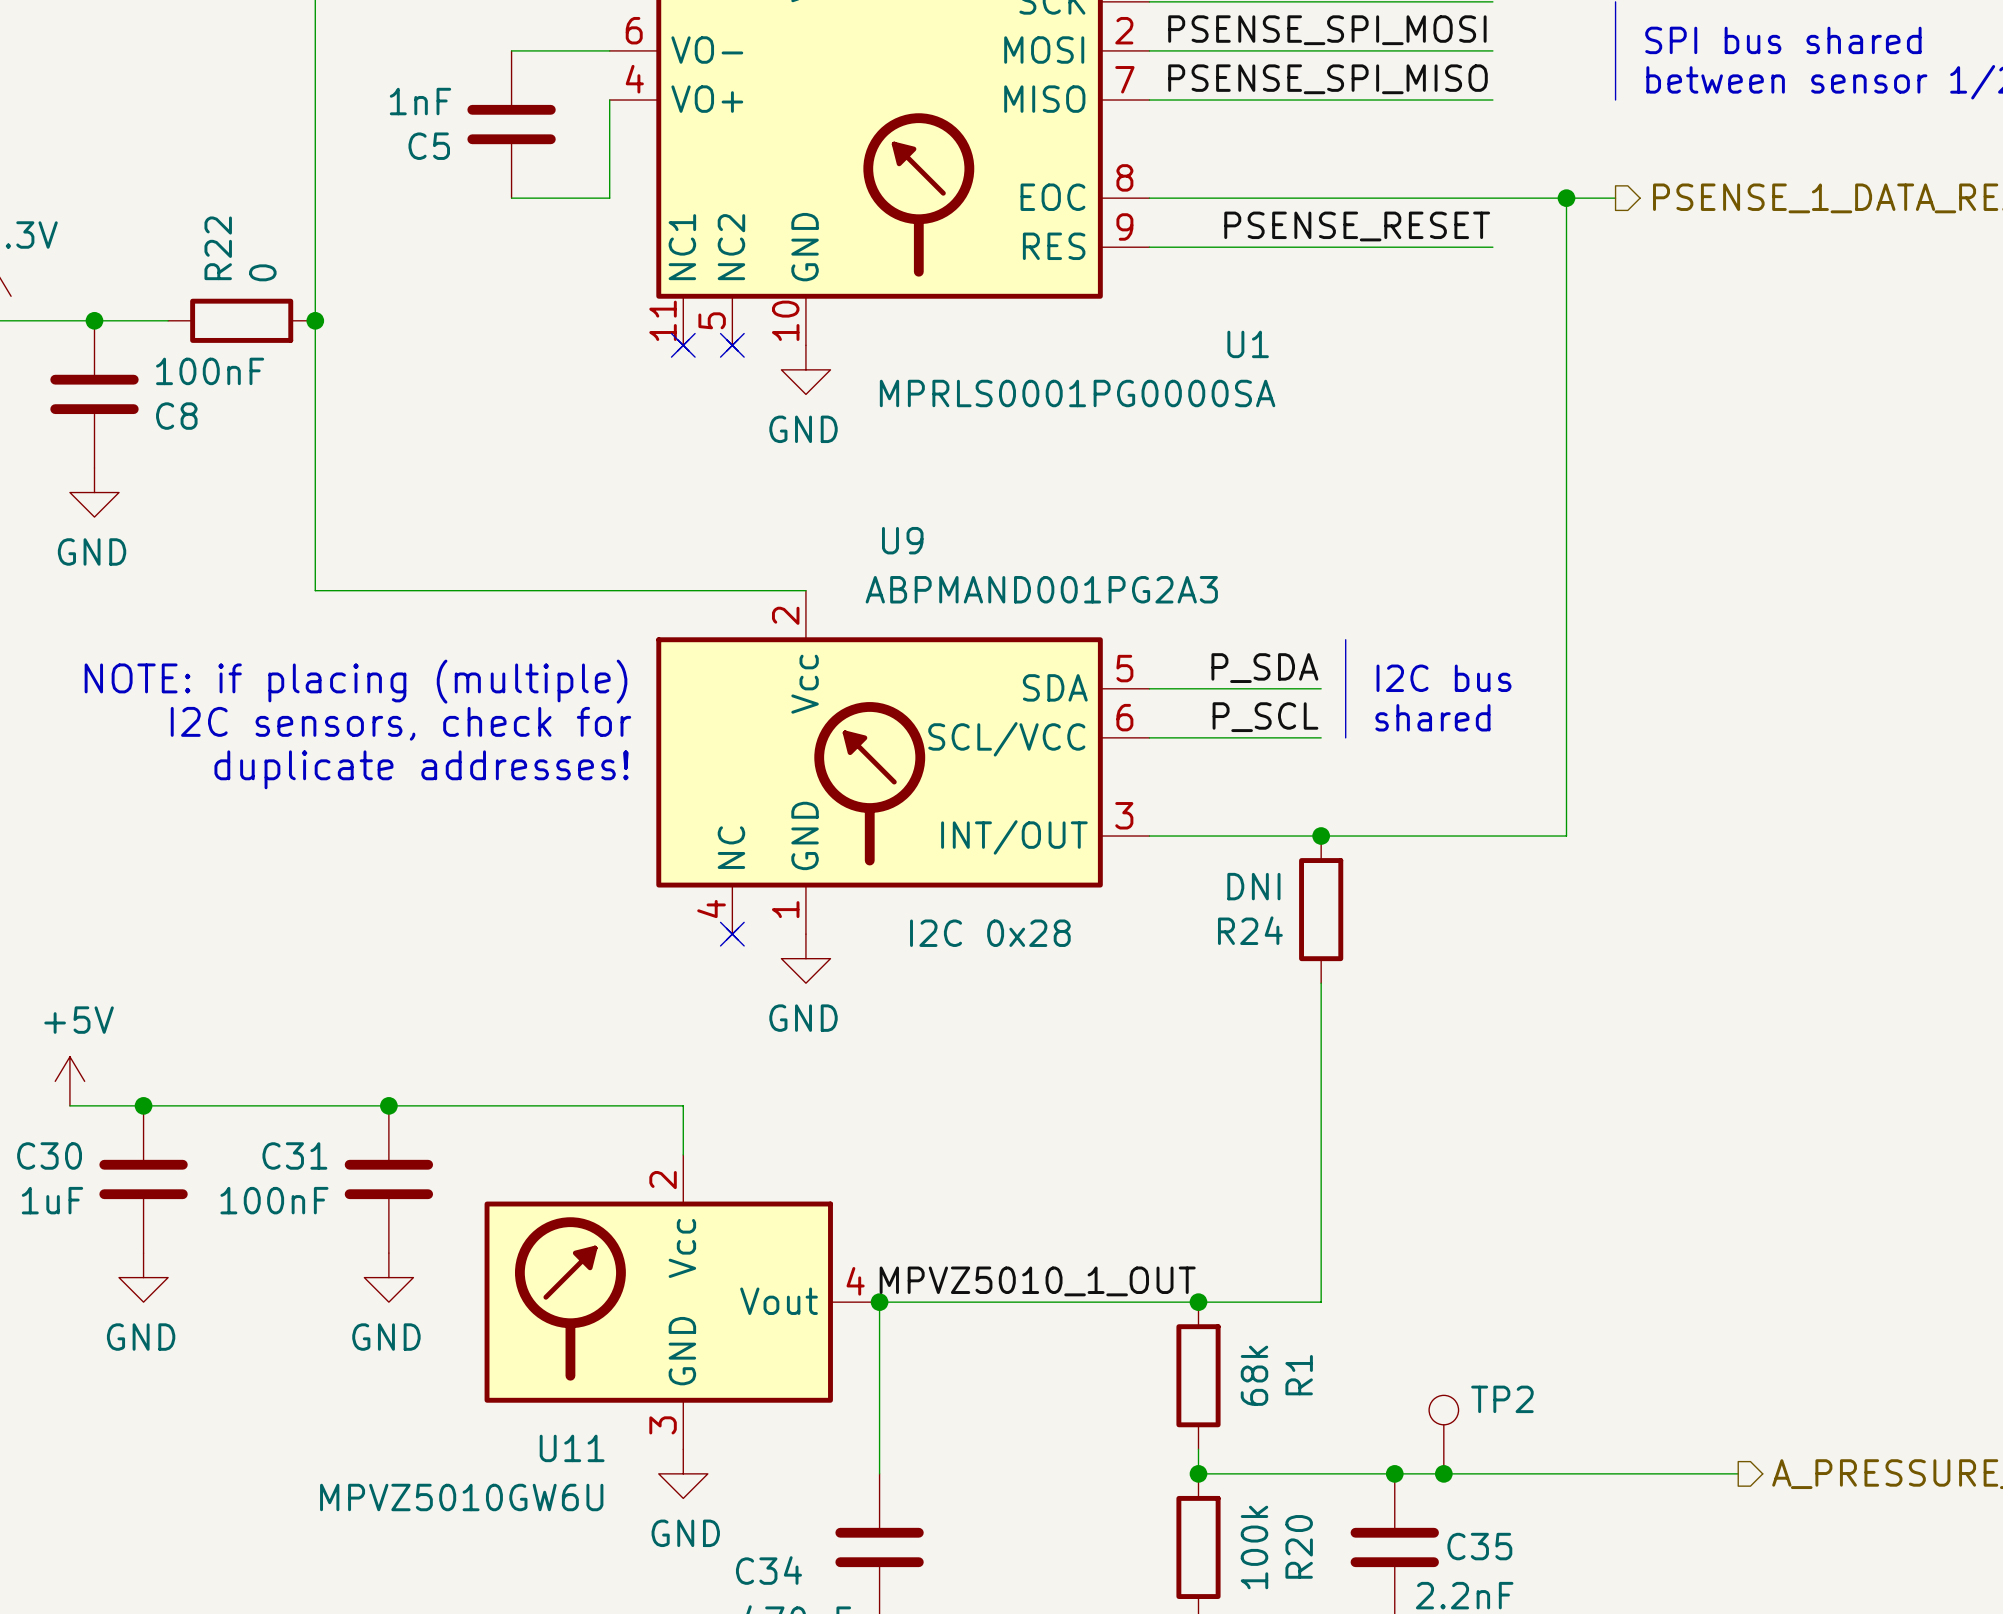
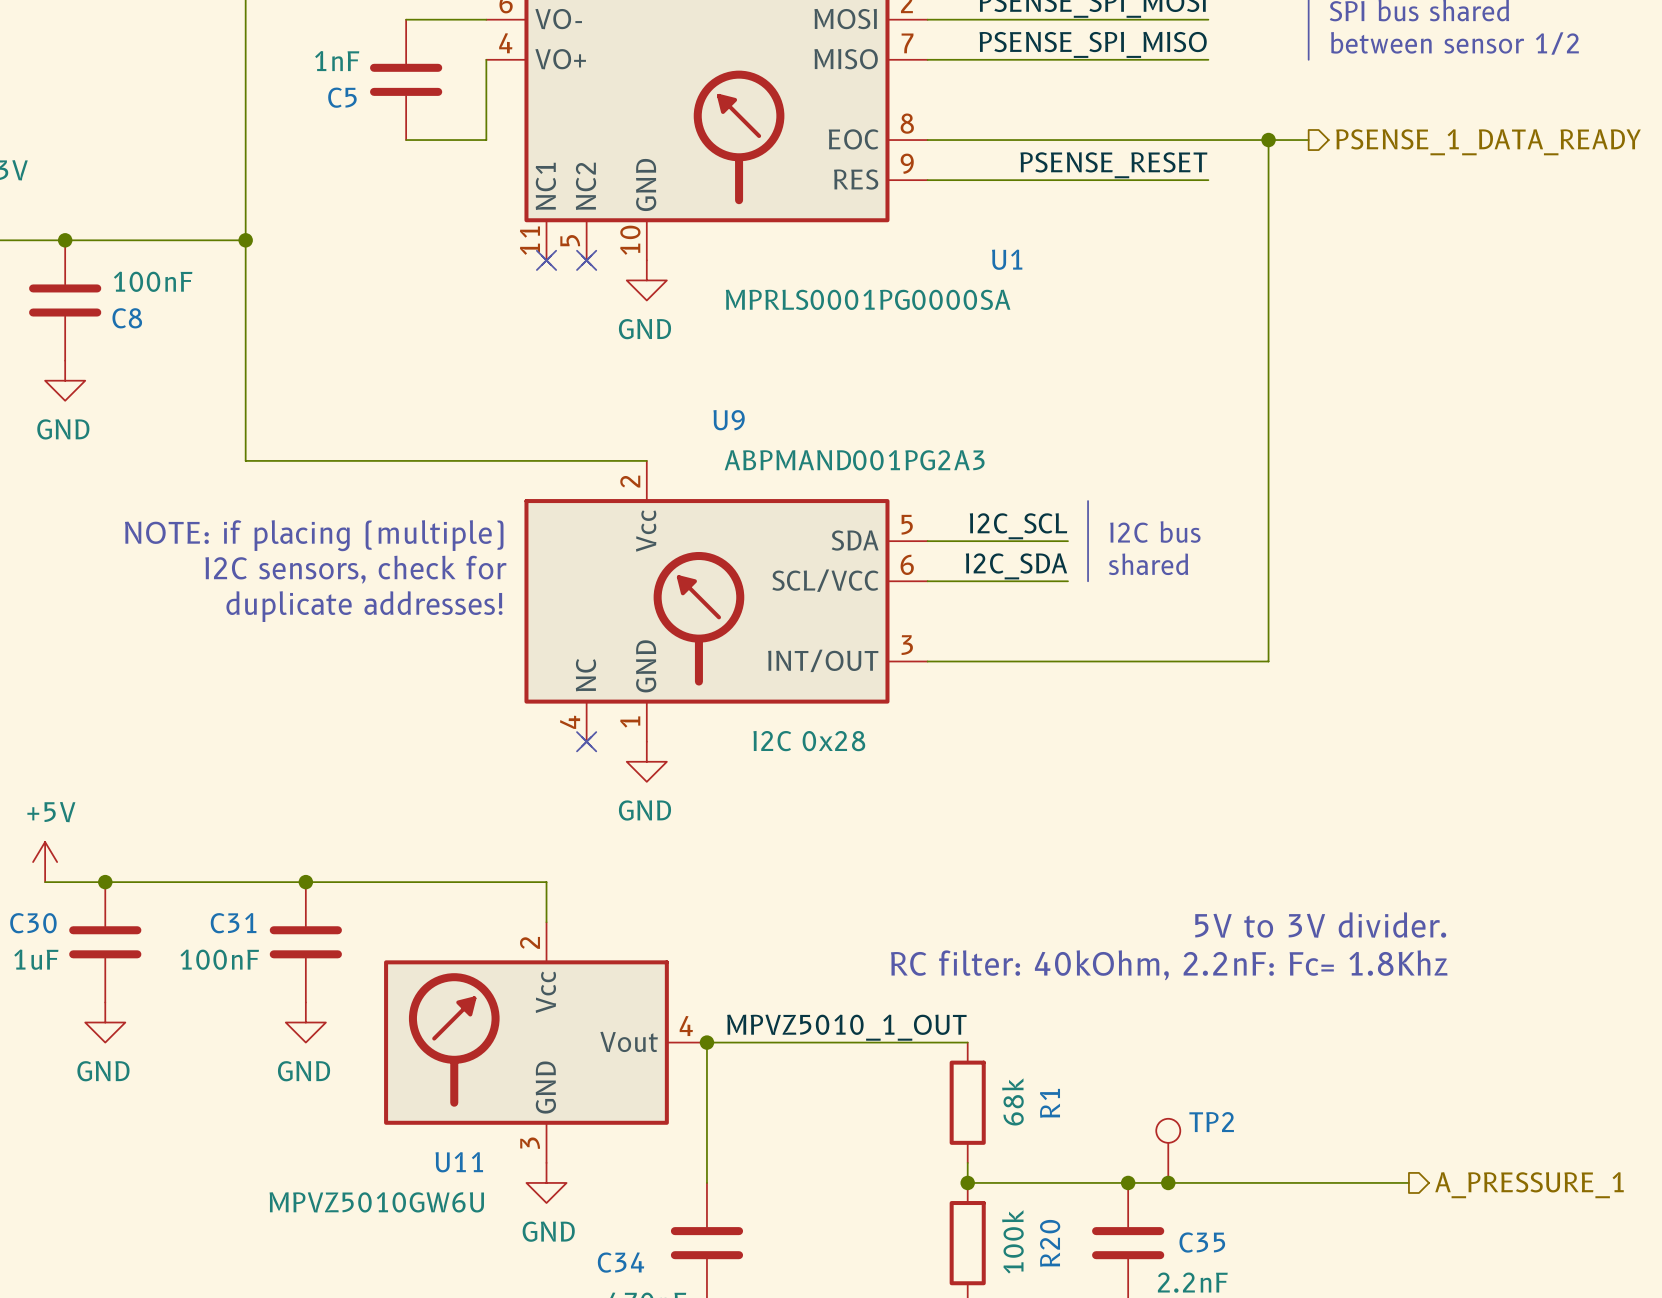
wire: none -> (125, 240) (245, 240)
R22: 0 (241, 320) -> none
label: P_SDA (1264, 668) -> I2C_SCL (1018, 526)
label: P_SCL (1265, 717) -> I2C_SDA (1016, 566)
junction: (1321, 836) -> none
R24: DNI (1321, 909) -> none
wire: (1321, 983) (1321, 1302) (1198, 1302) -> none
text: none -> 5V to 3V divider. (1320, 924)
text: none -> RC filter: 40kOhm, 2.2nF: Fc= 1.8Khz (1169, 965)
junction: (1198, 1302) -> none

